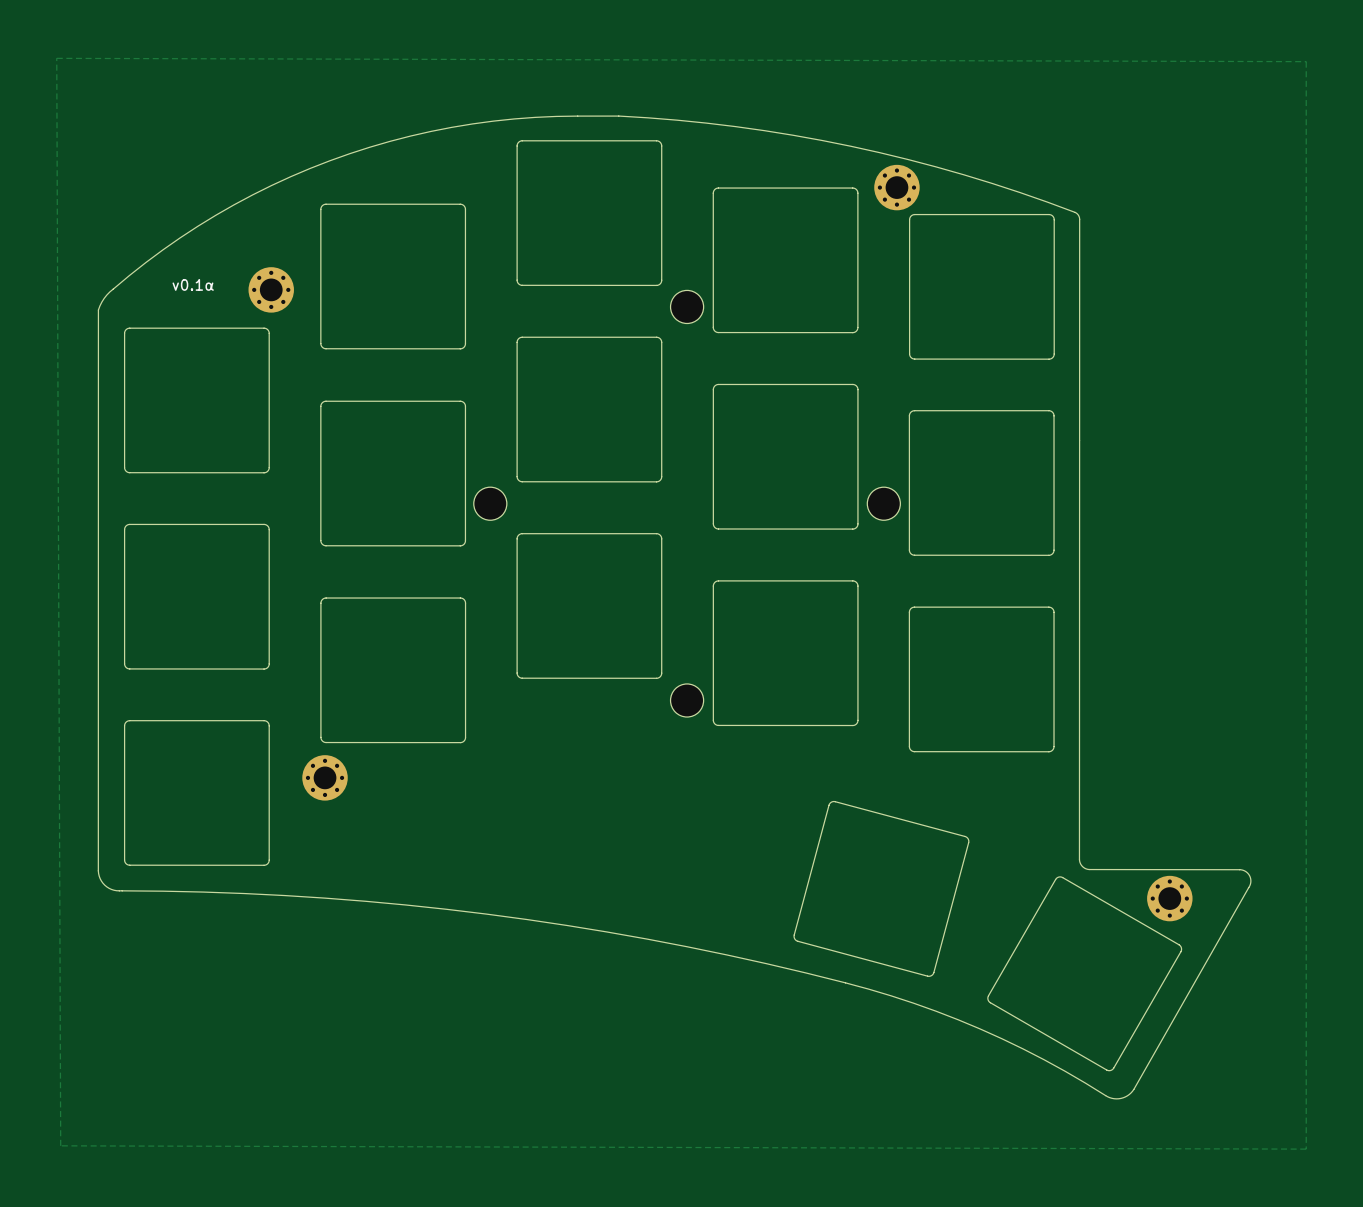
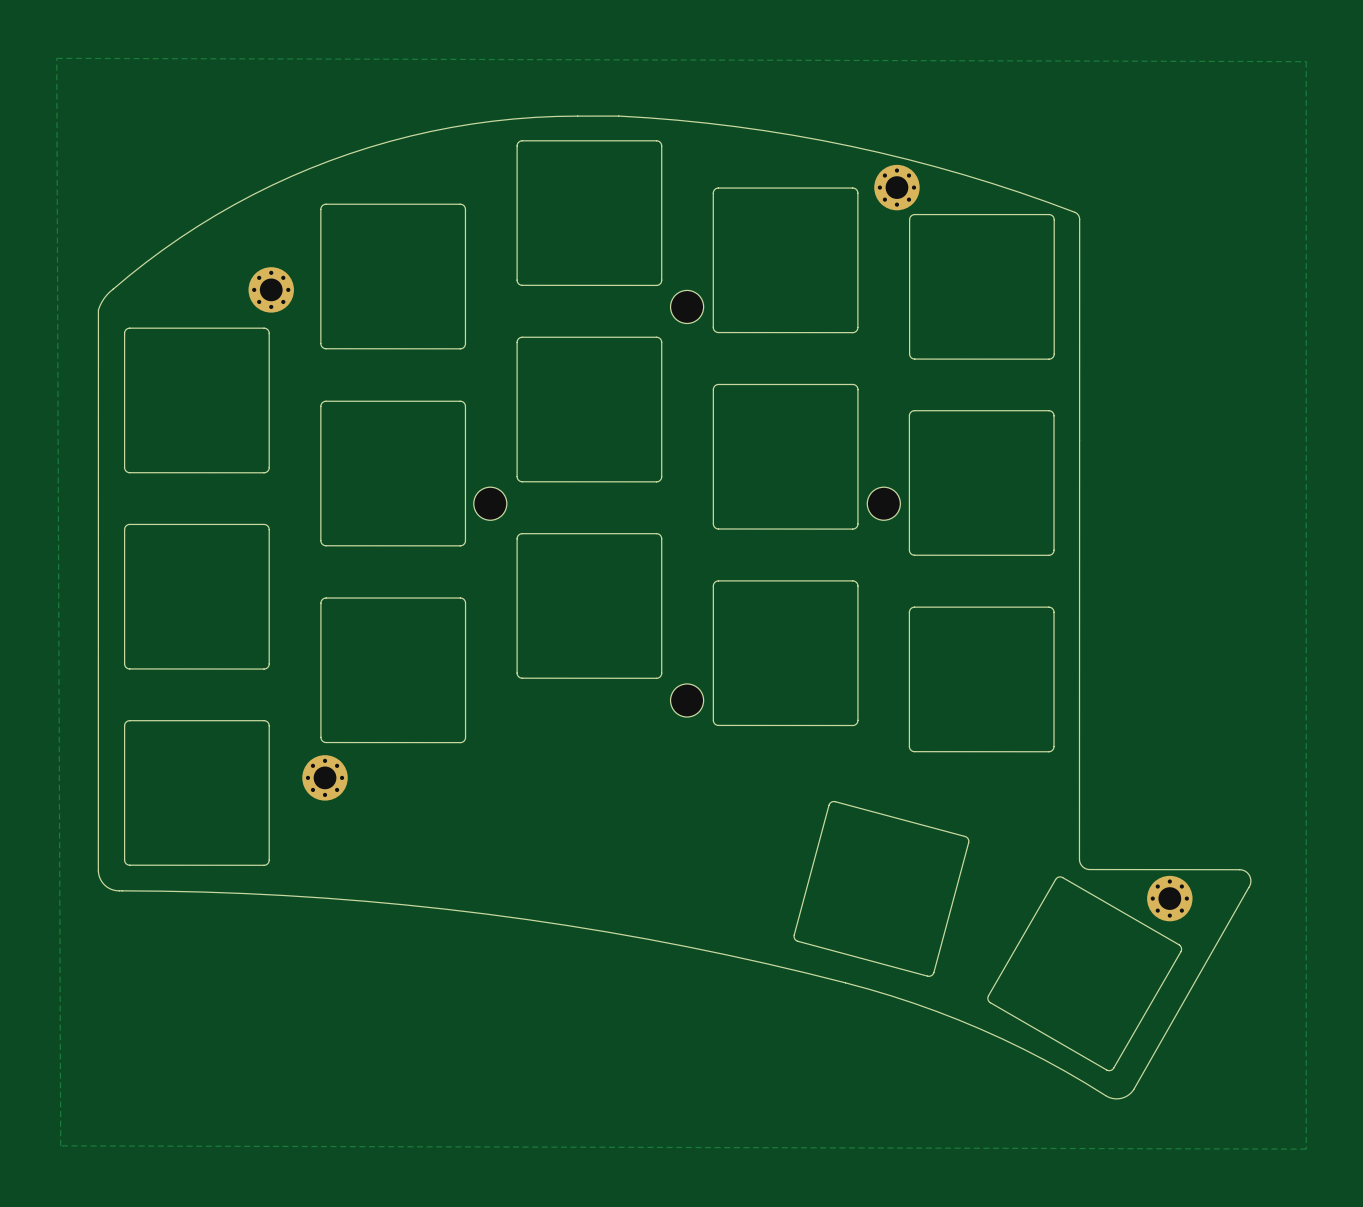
text: v0.1α (193, 284) -> none

